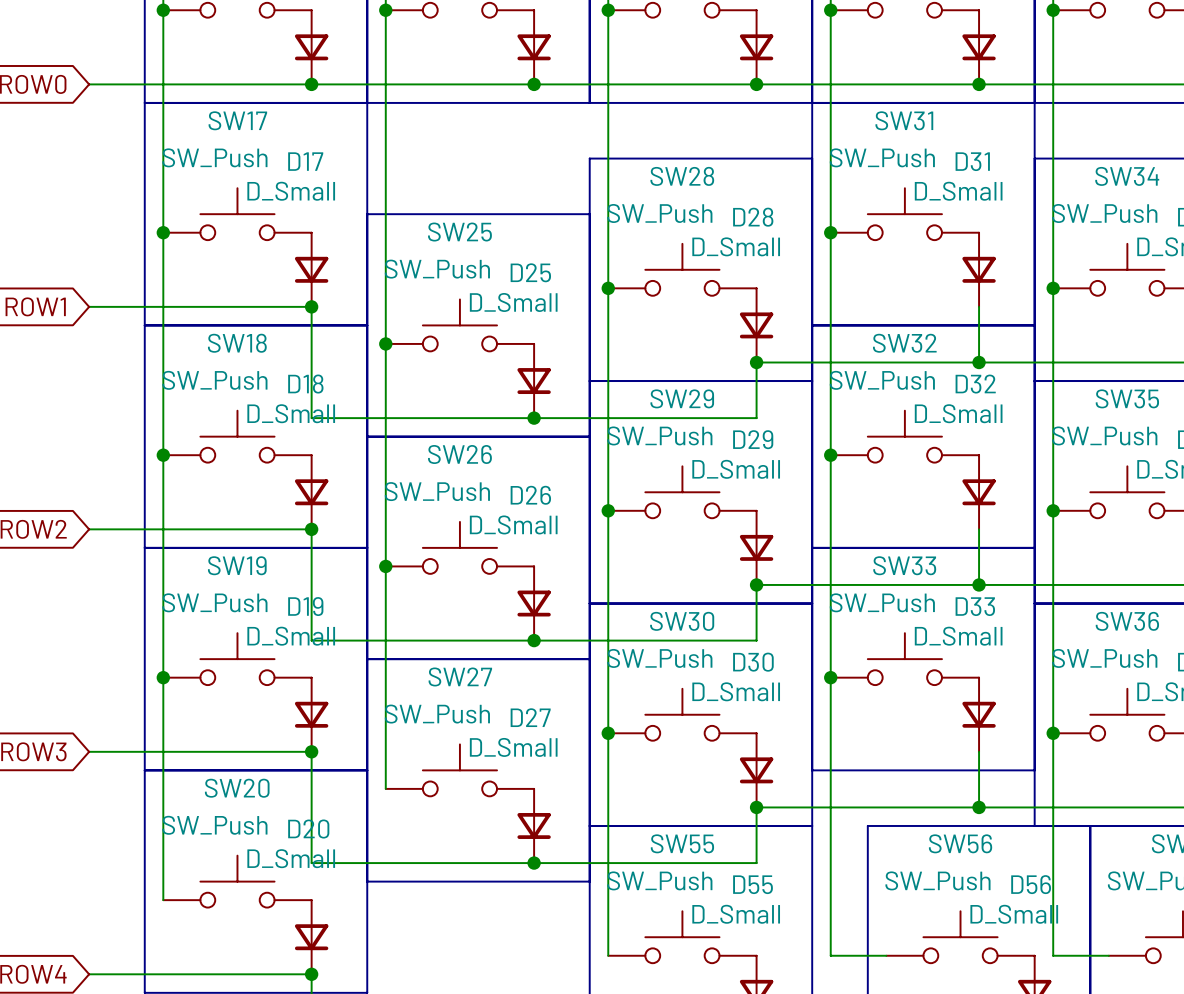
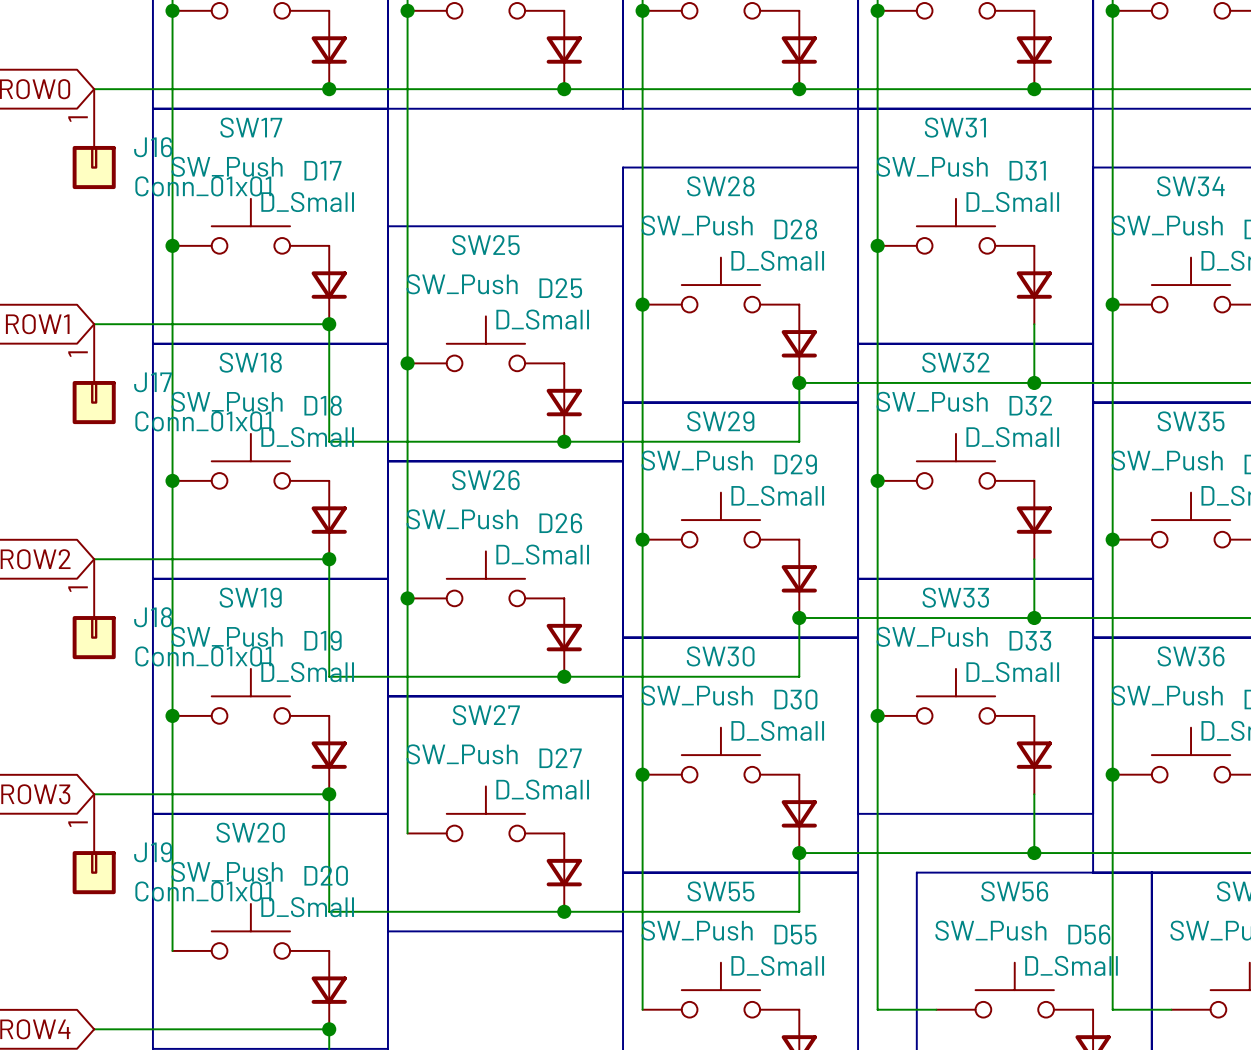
J16: none -> Conn_01x01 (94, 139)
J17: none -> Conn_01x01 (94, 374)
J18: none -> Conn_01x01 (94, 609)
J19: none -> Conn_01x01 (94, 844)

